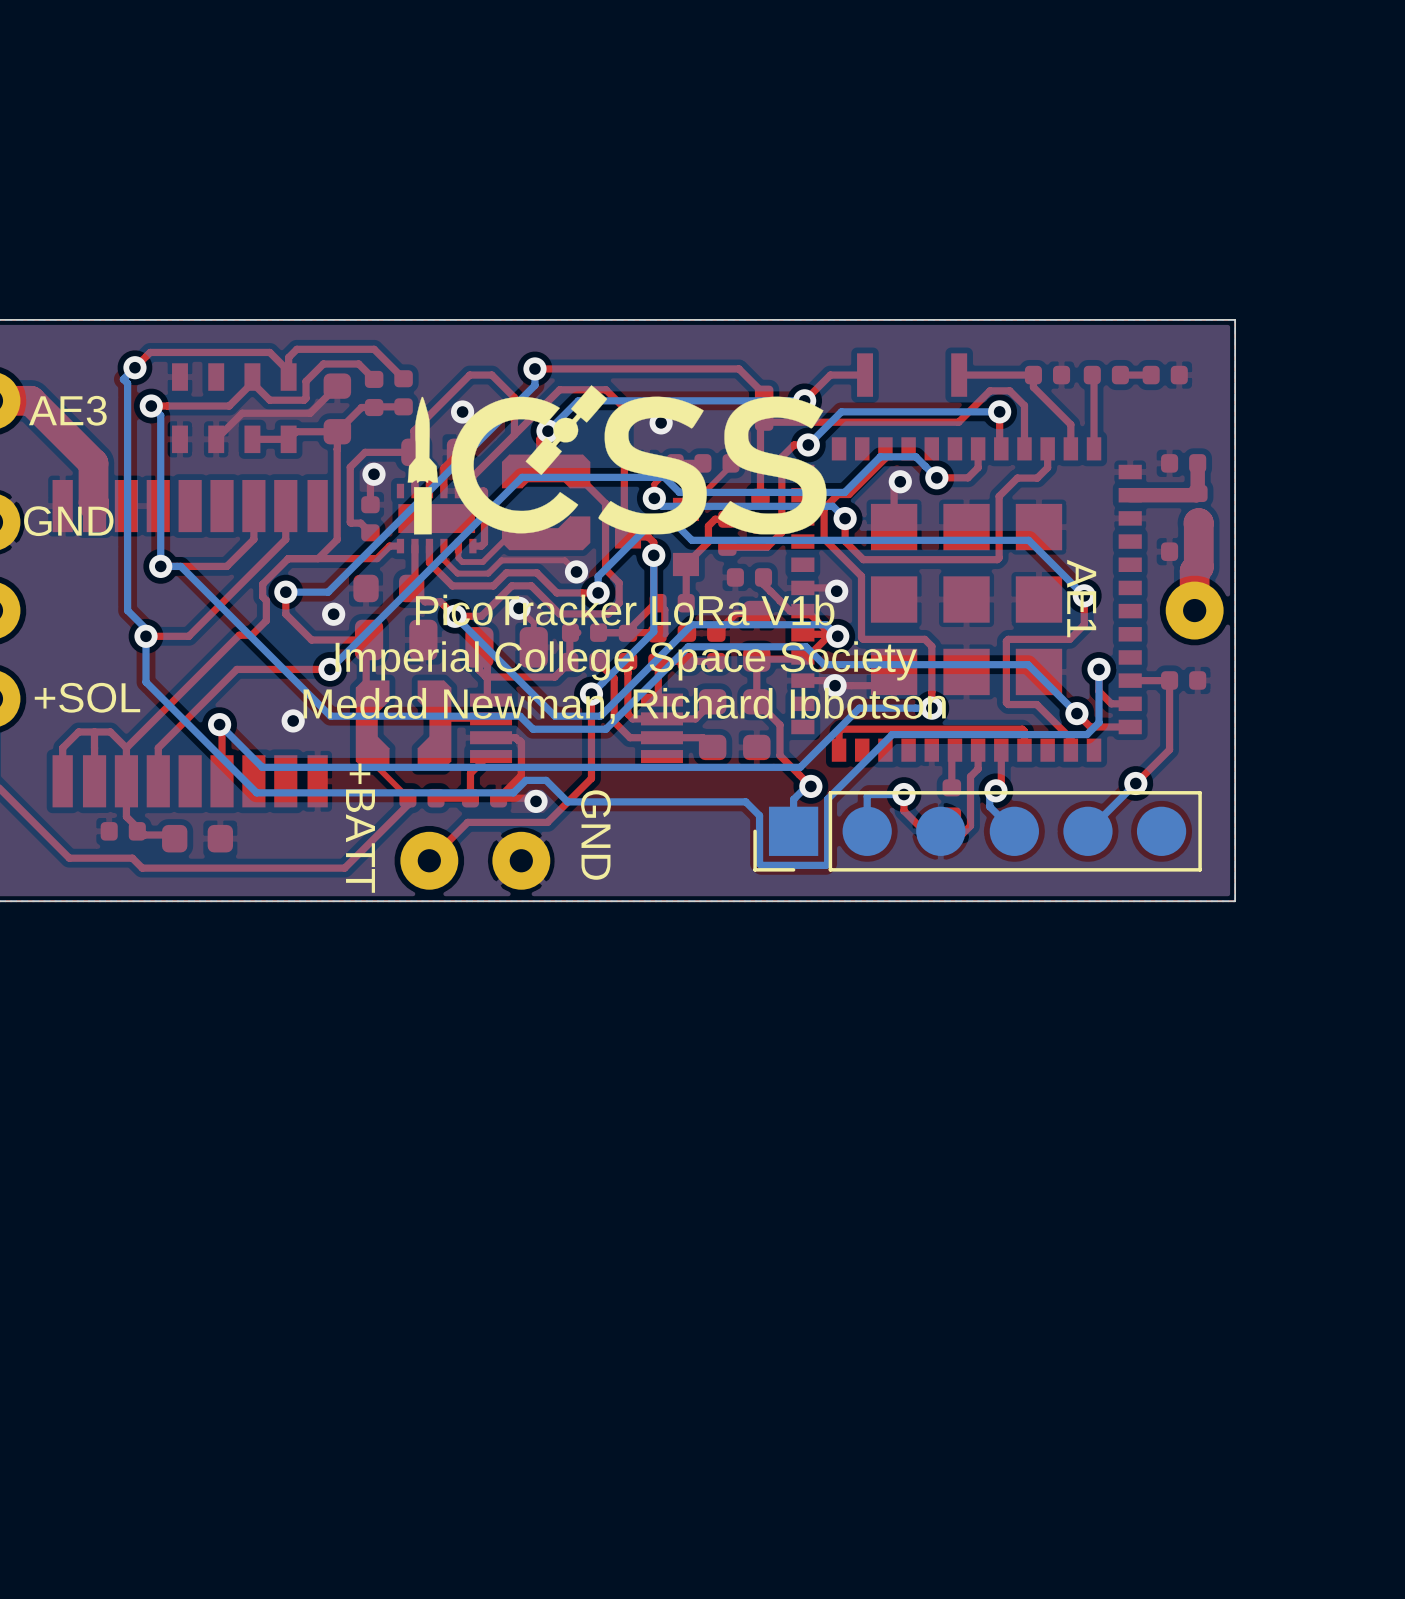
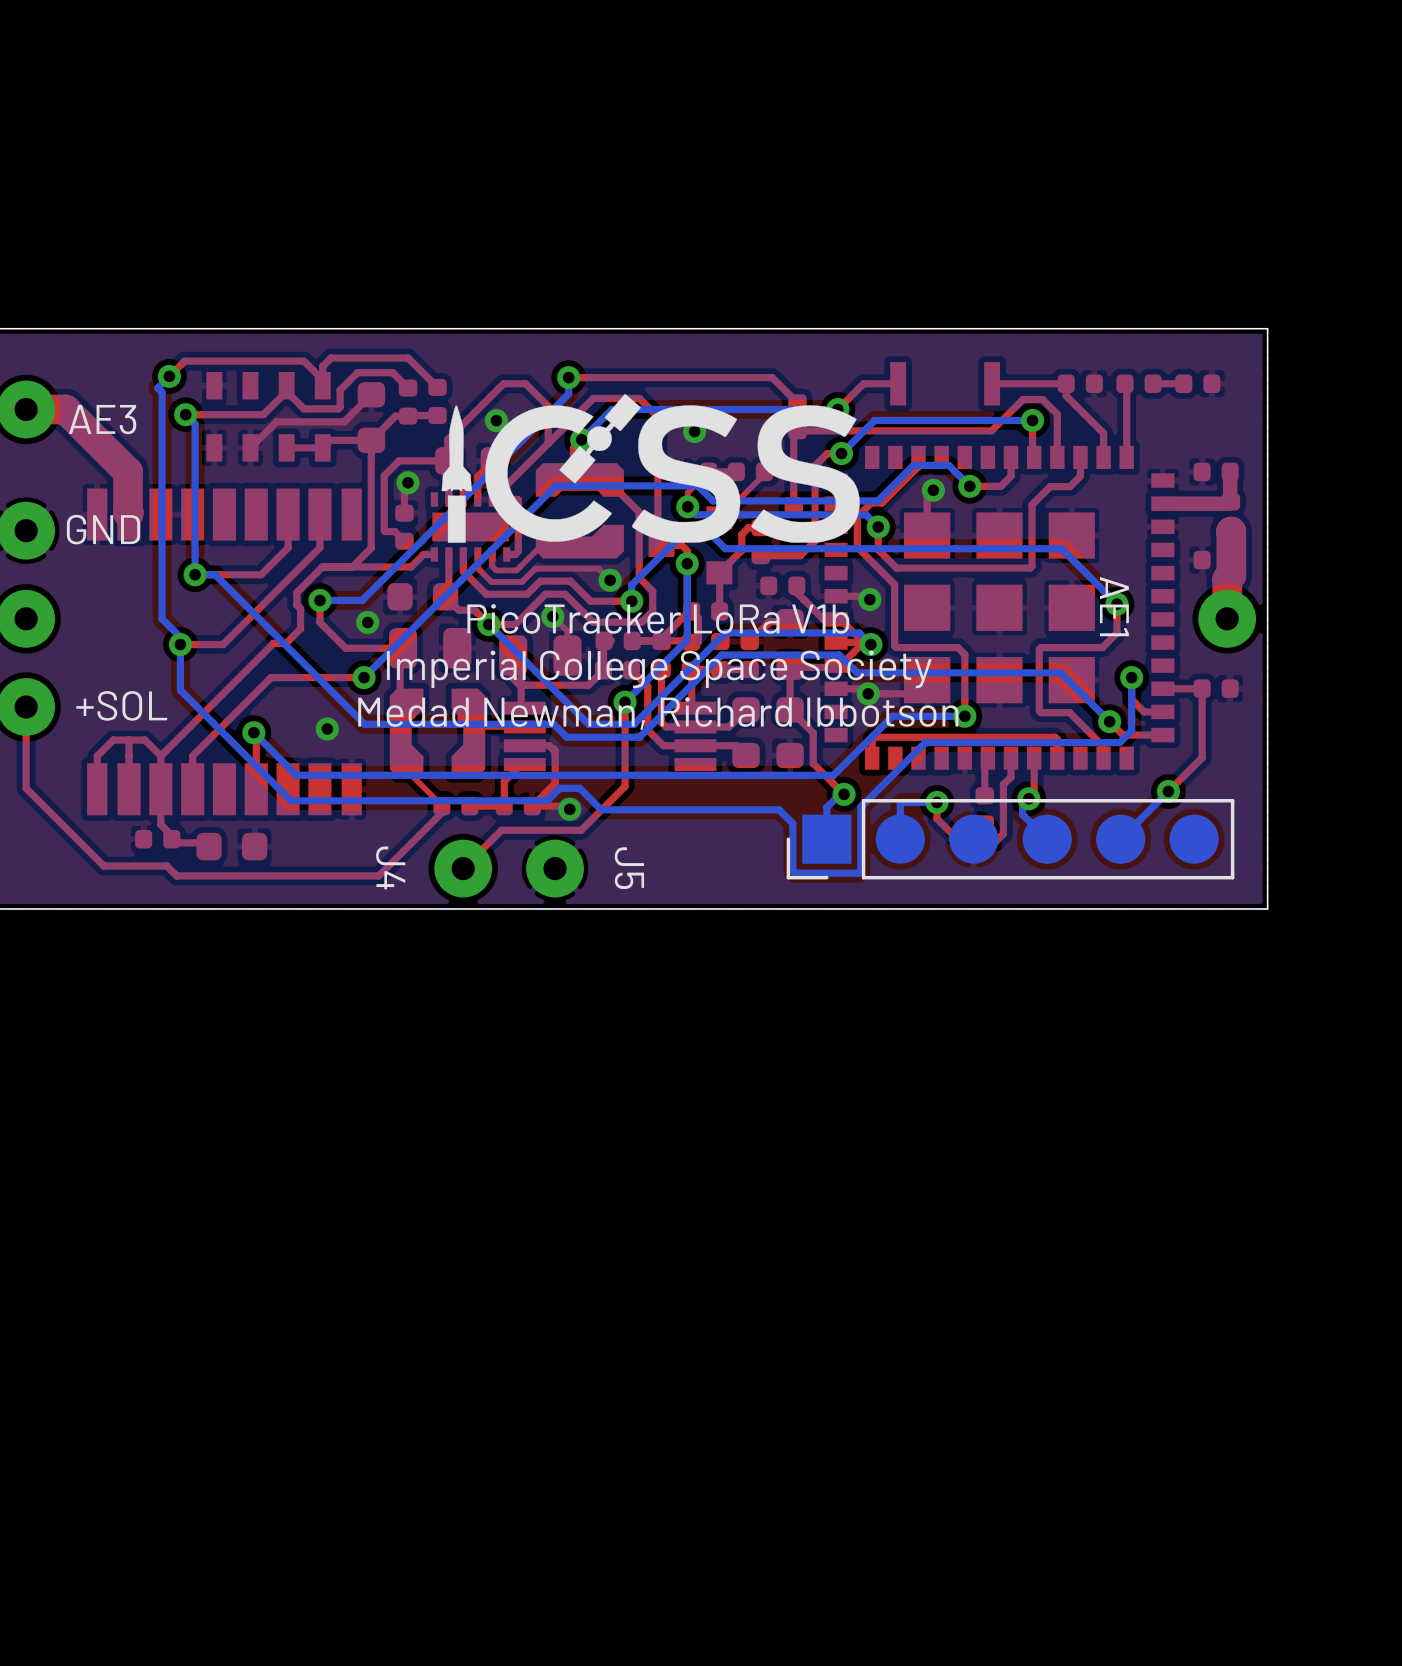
+BATT name: +BATT (360, 828) -> J4 (390, 867)
GND name: GND (596, 835) -> J5 (629, 868)

